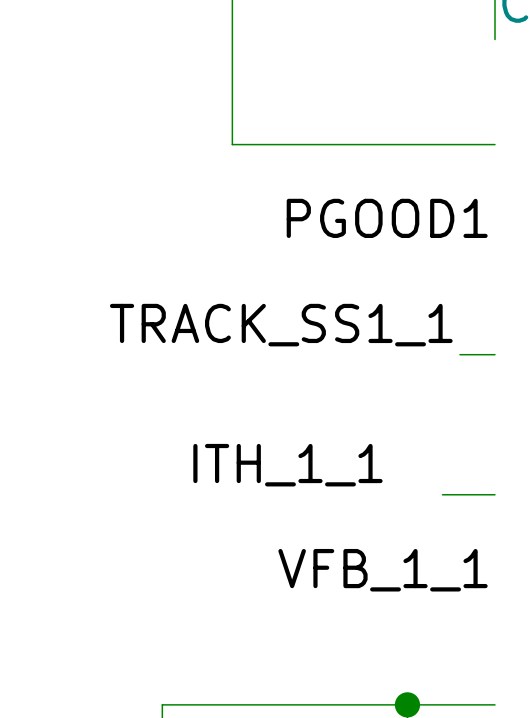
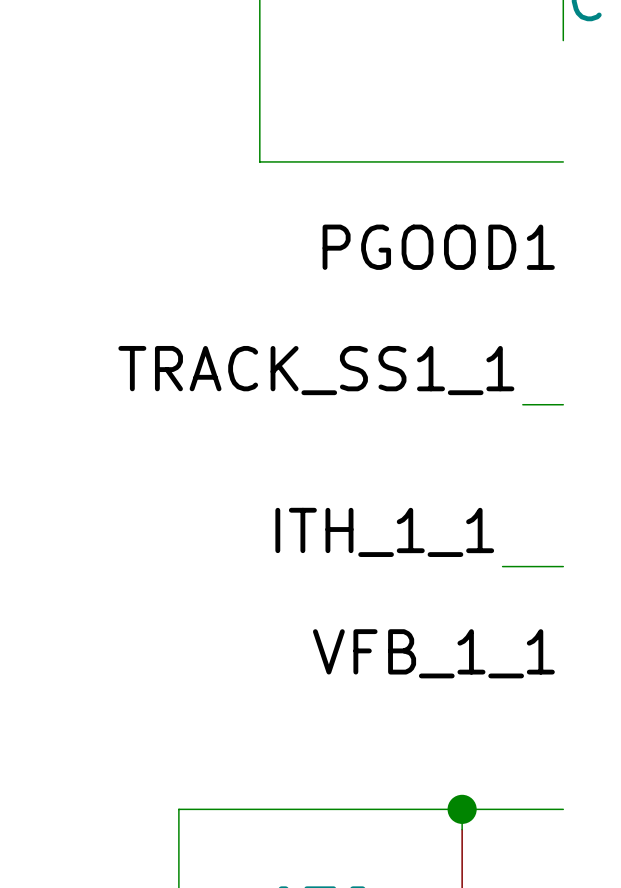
label position: ITH_1_1 (287, 465) -> ITH_1_1 (384, 532)

